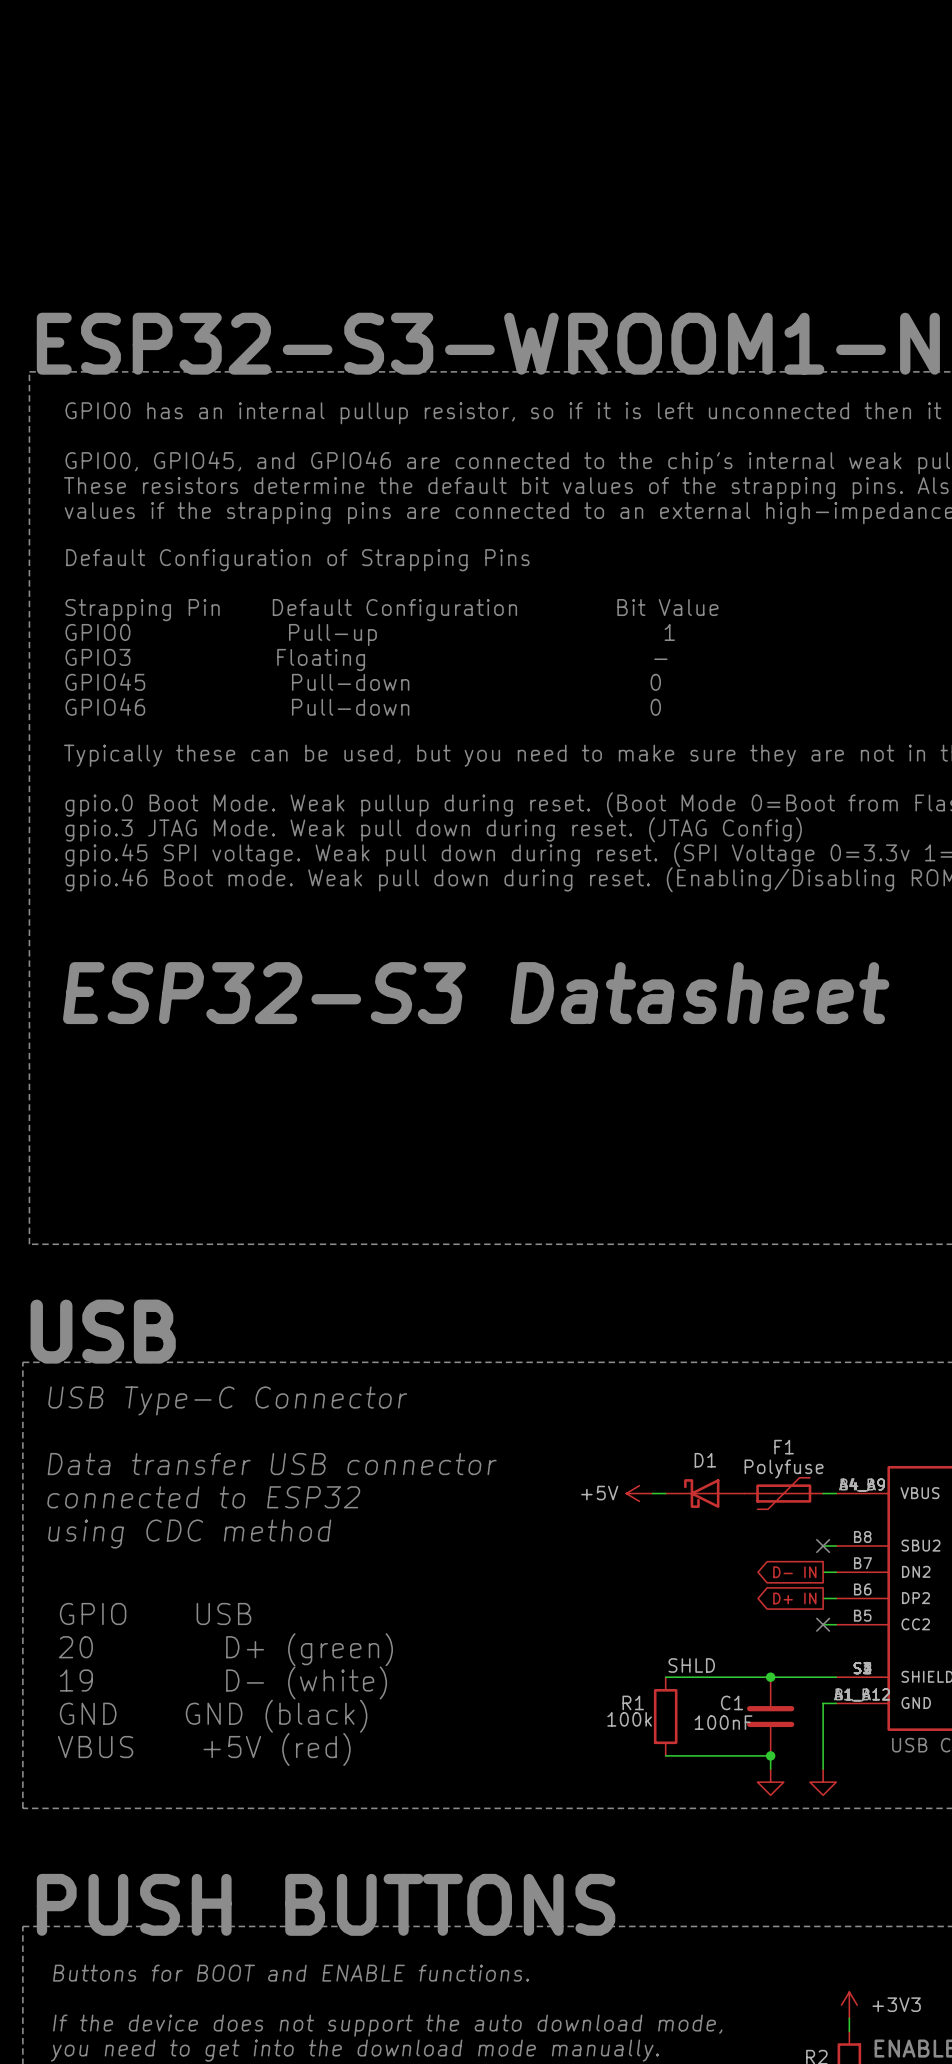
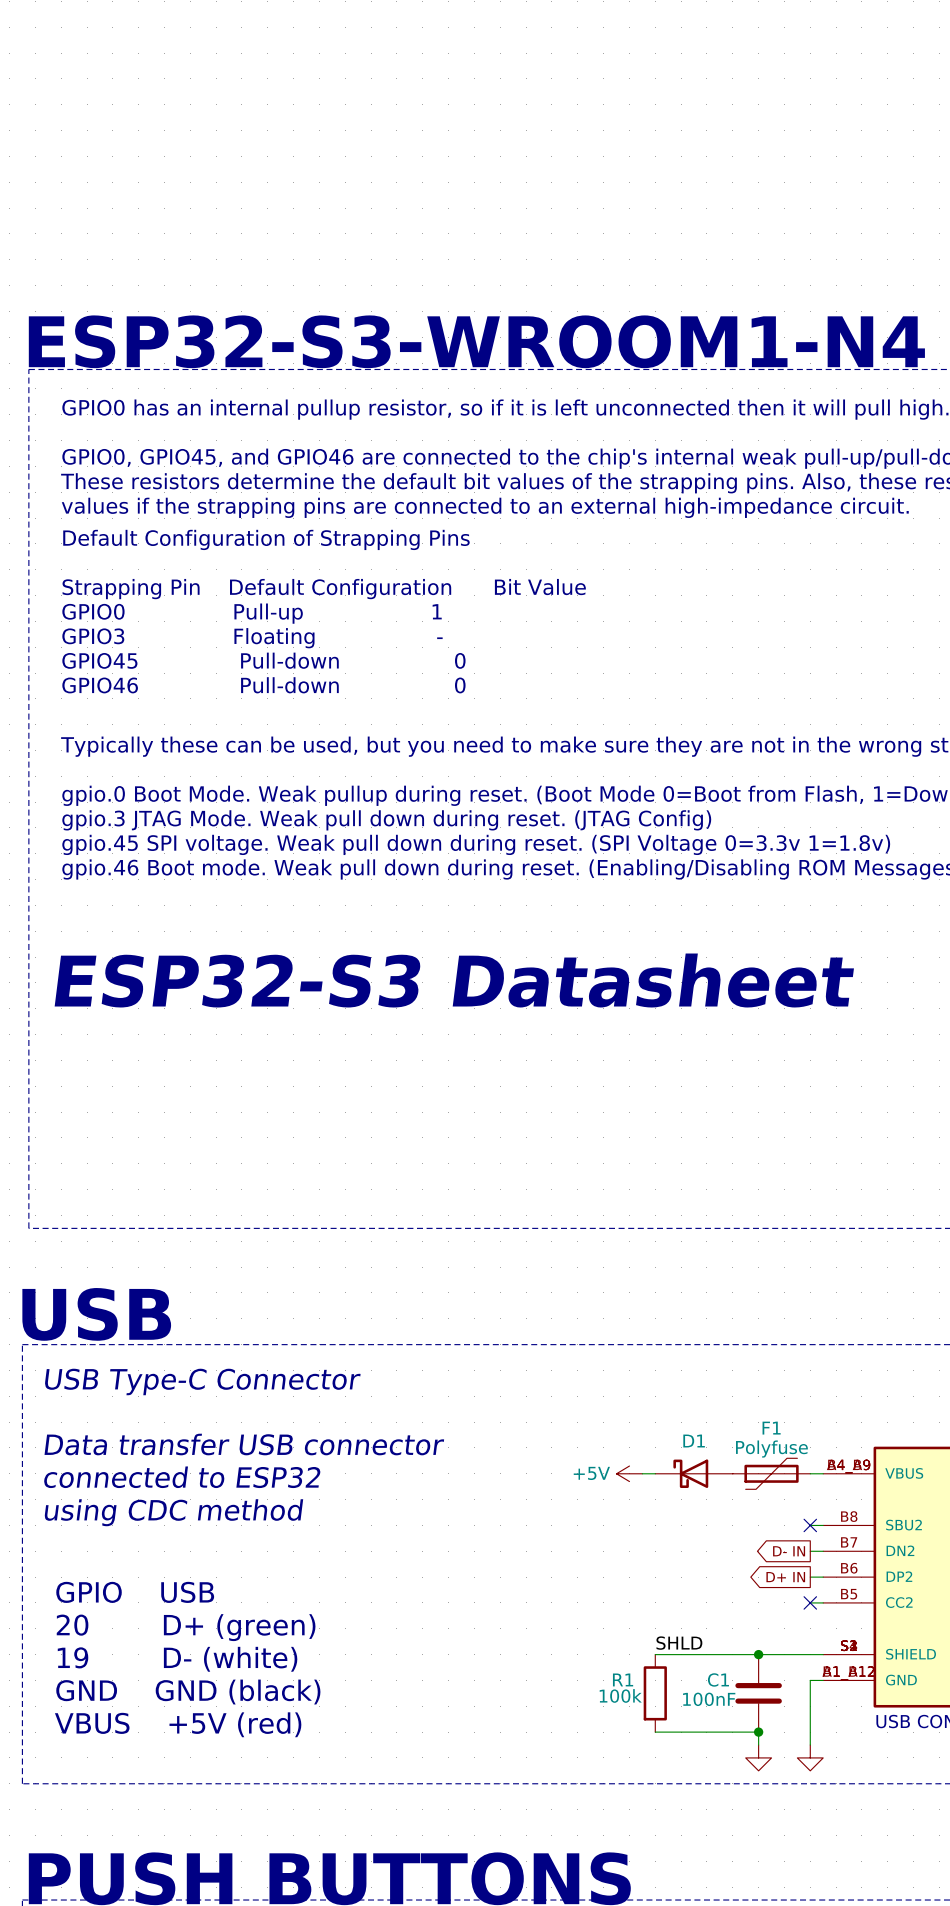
text position: Default Configuration of Strapping Pins (297, 560) -> Default Configuration of Strapping Pins (266, 539)
text: none -> Strapping Pin Default Configuration Bit Value (324, 589)
text: Strapping Pin Default Configuration Bit Value (391, 610) -> GPIO0 Pull-up 1 (252, 613)
text: GPIO0 Pull-up 1 (370, 635) -> GPIO3 Floating - (252, 638)
text: GPIO3 Floating - (366, 659) -> GPIO45 Pull-down 0 (263, 660)
text: GPIO45 Pull-down 0 (363, 681) -> GPIO46 Pull-down 0 (263, 685)
text: GPIO46 Pull-down 0 (363, 706) -> none

